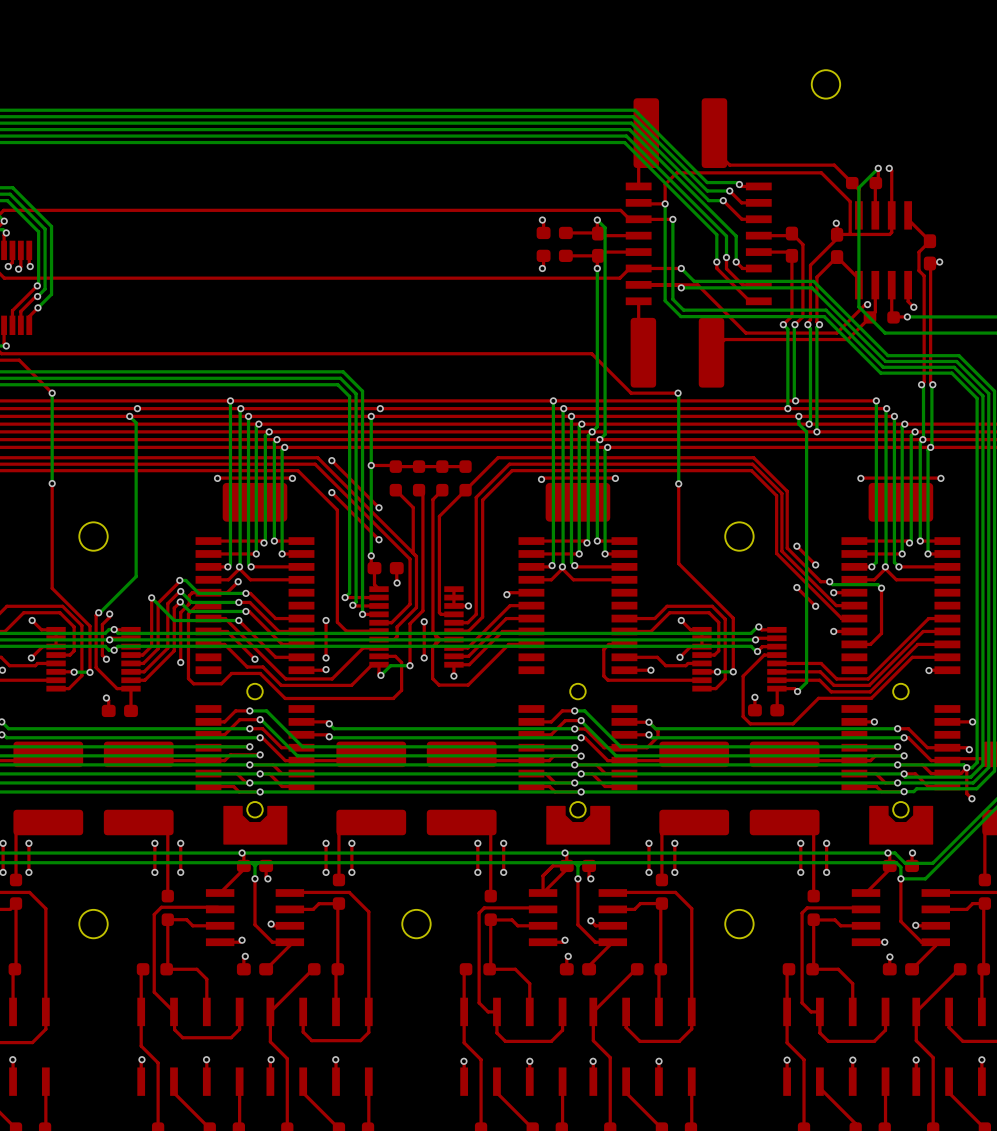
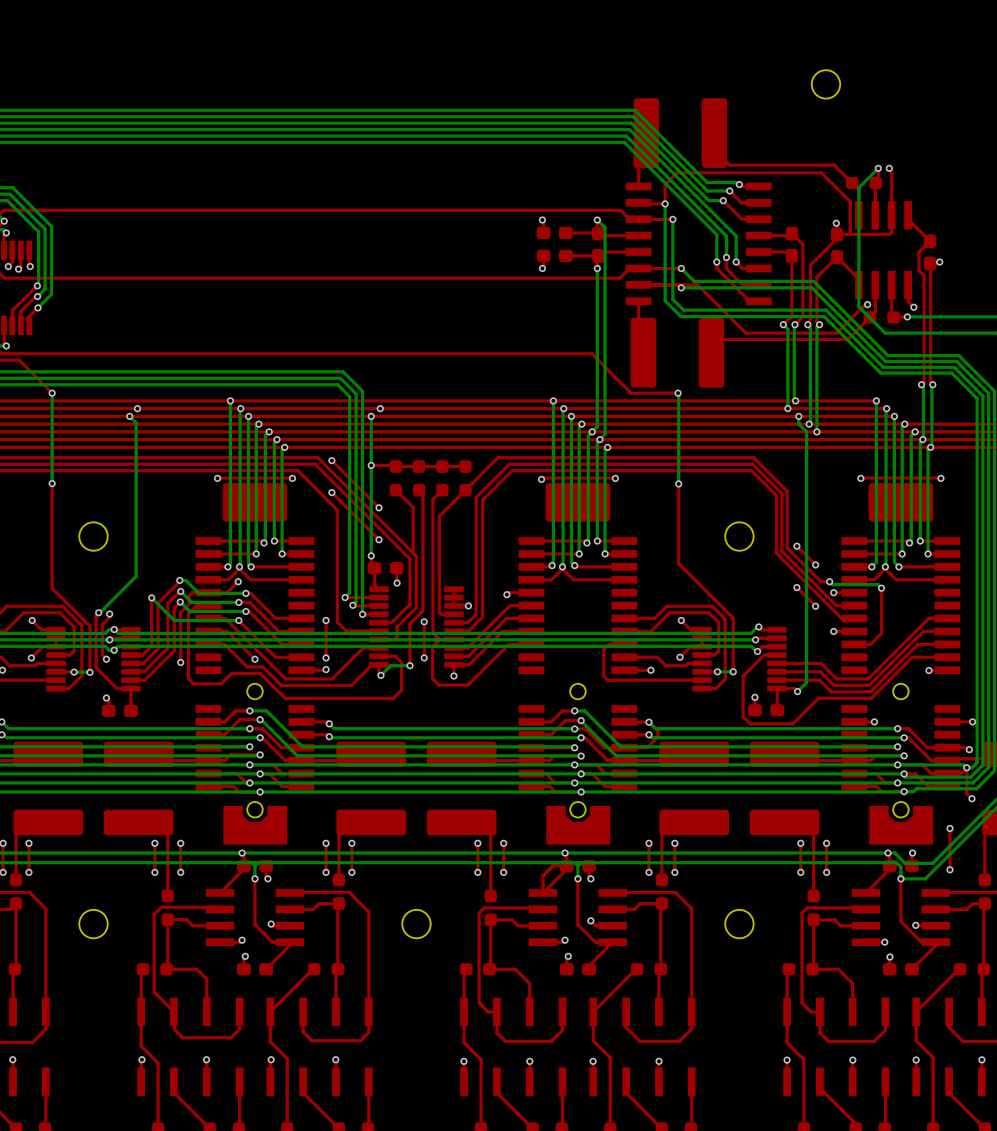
top track: none -> (949, 828) (949, 869)
via: none -> (949, 828)
via: none -> (949, 869)

